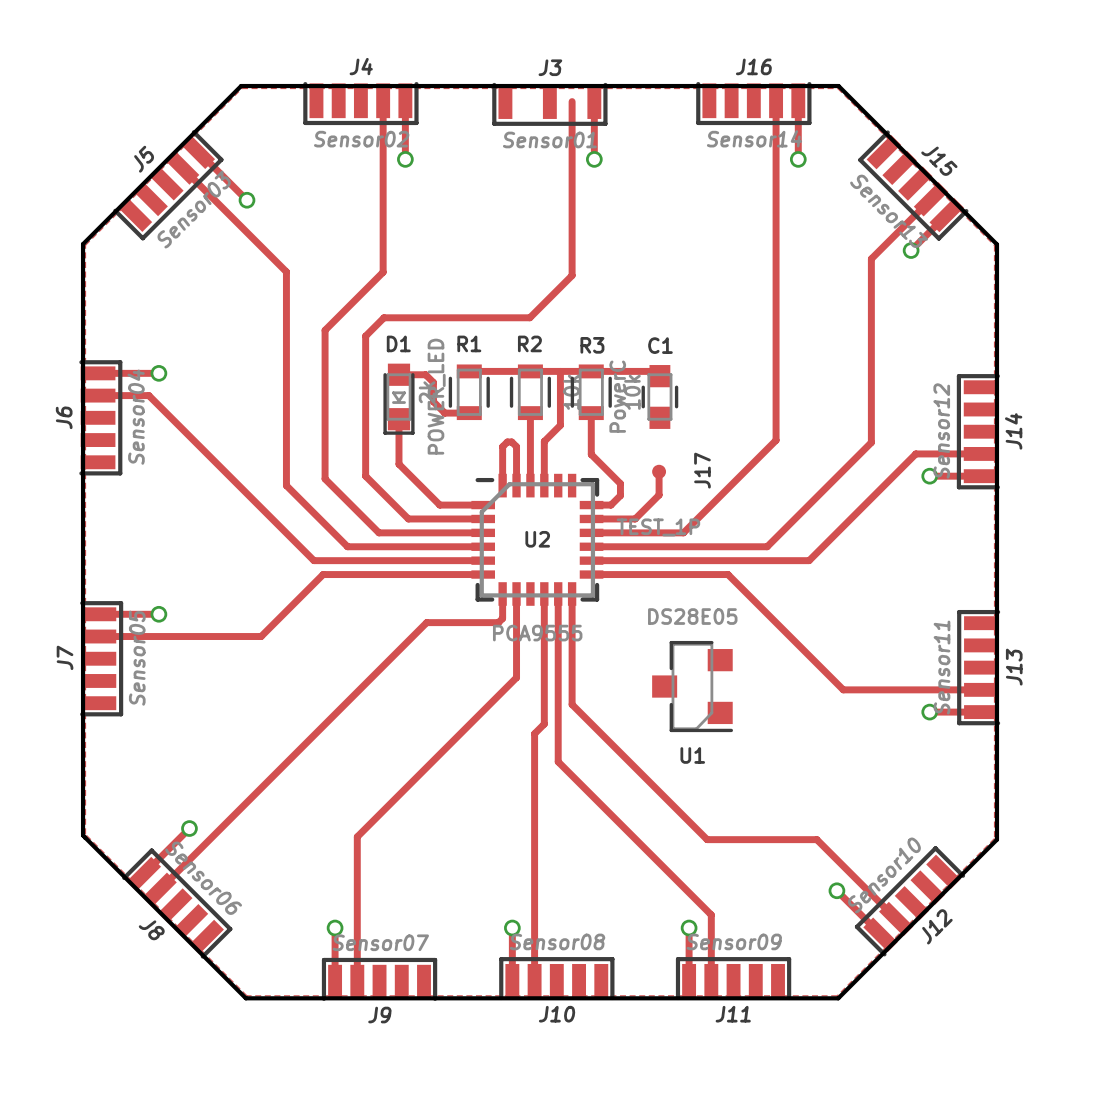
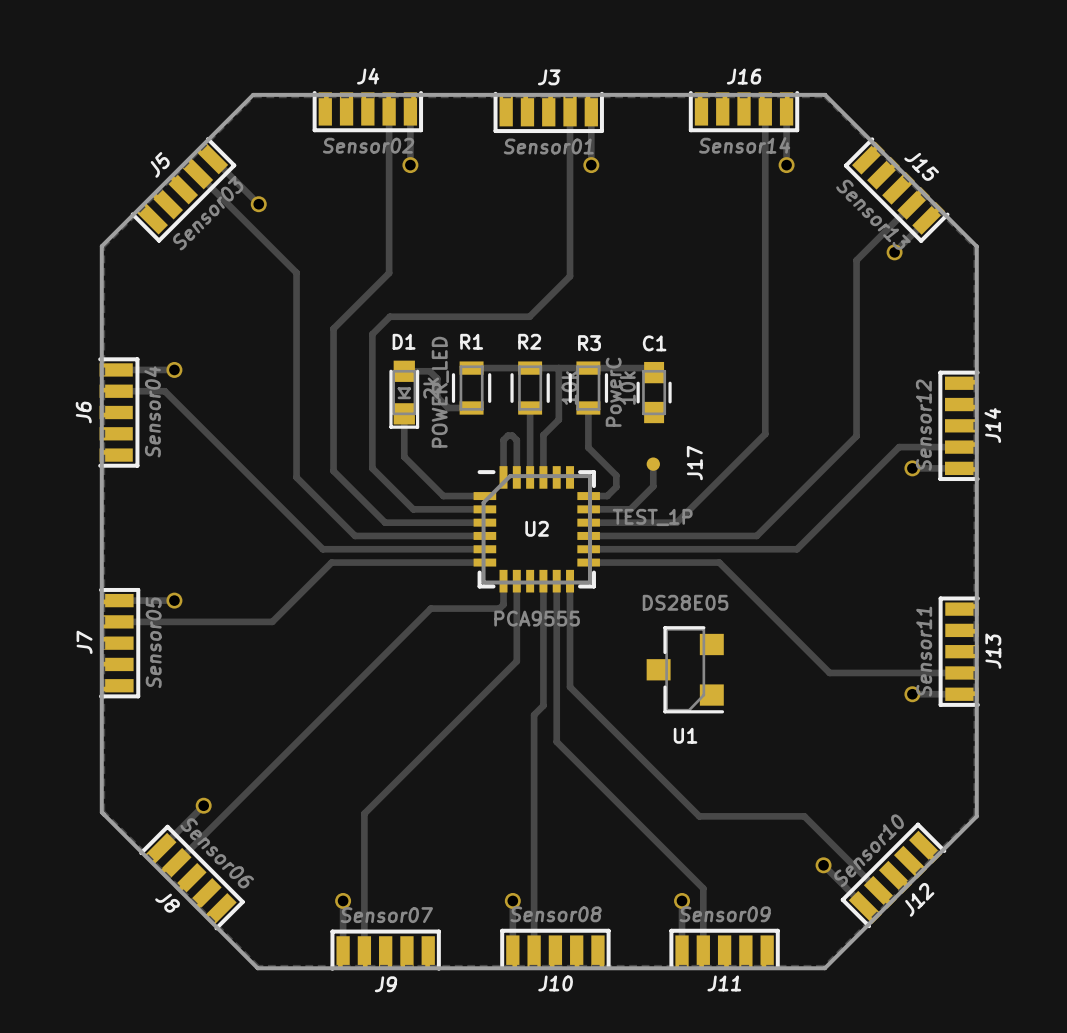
J3 footprint: [492, 82, 608, 126] -> [493, 91, 604, 134]

